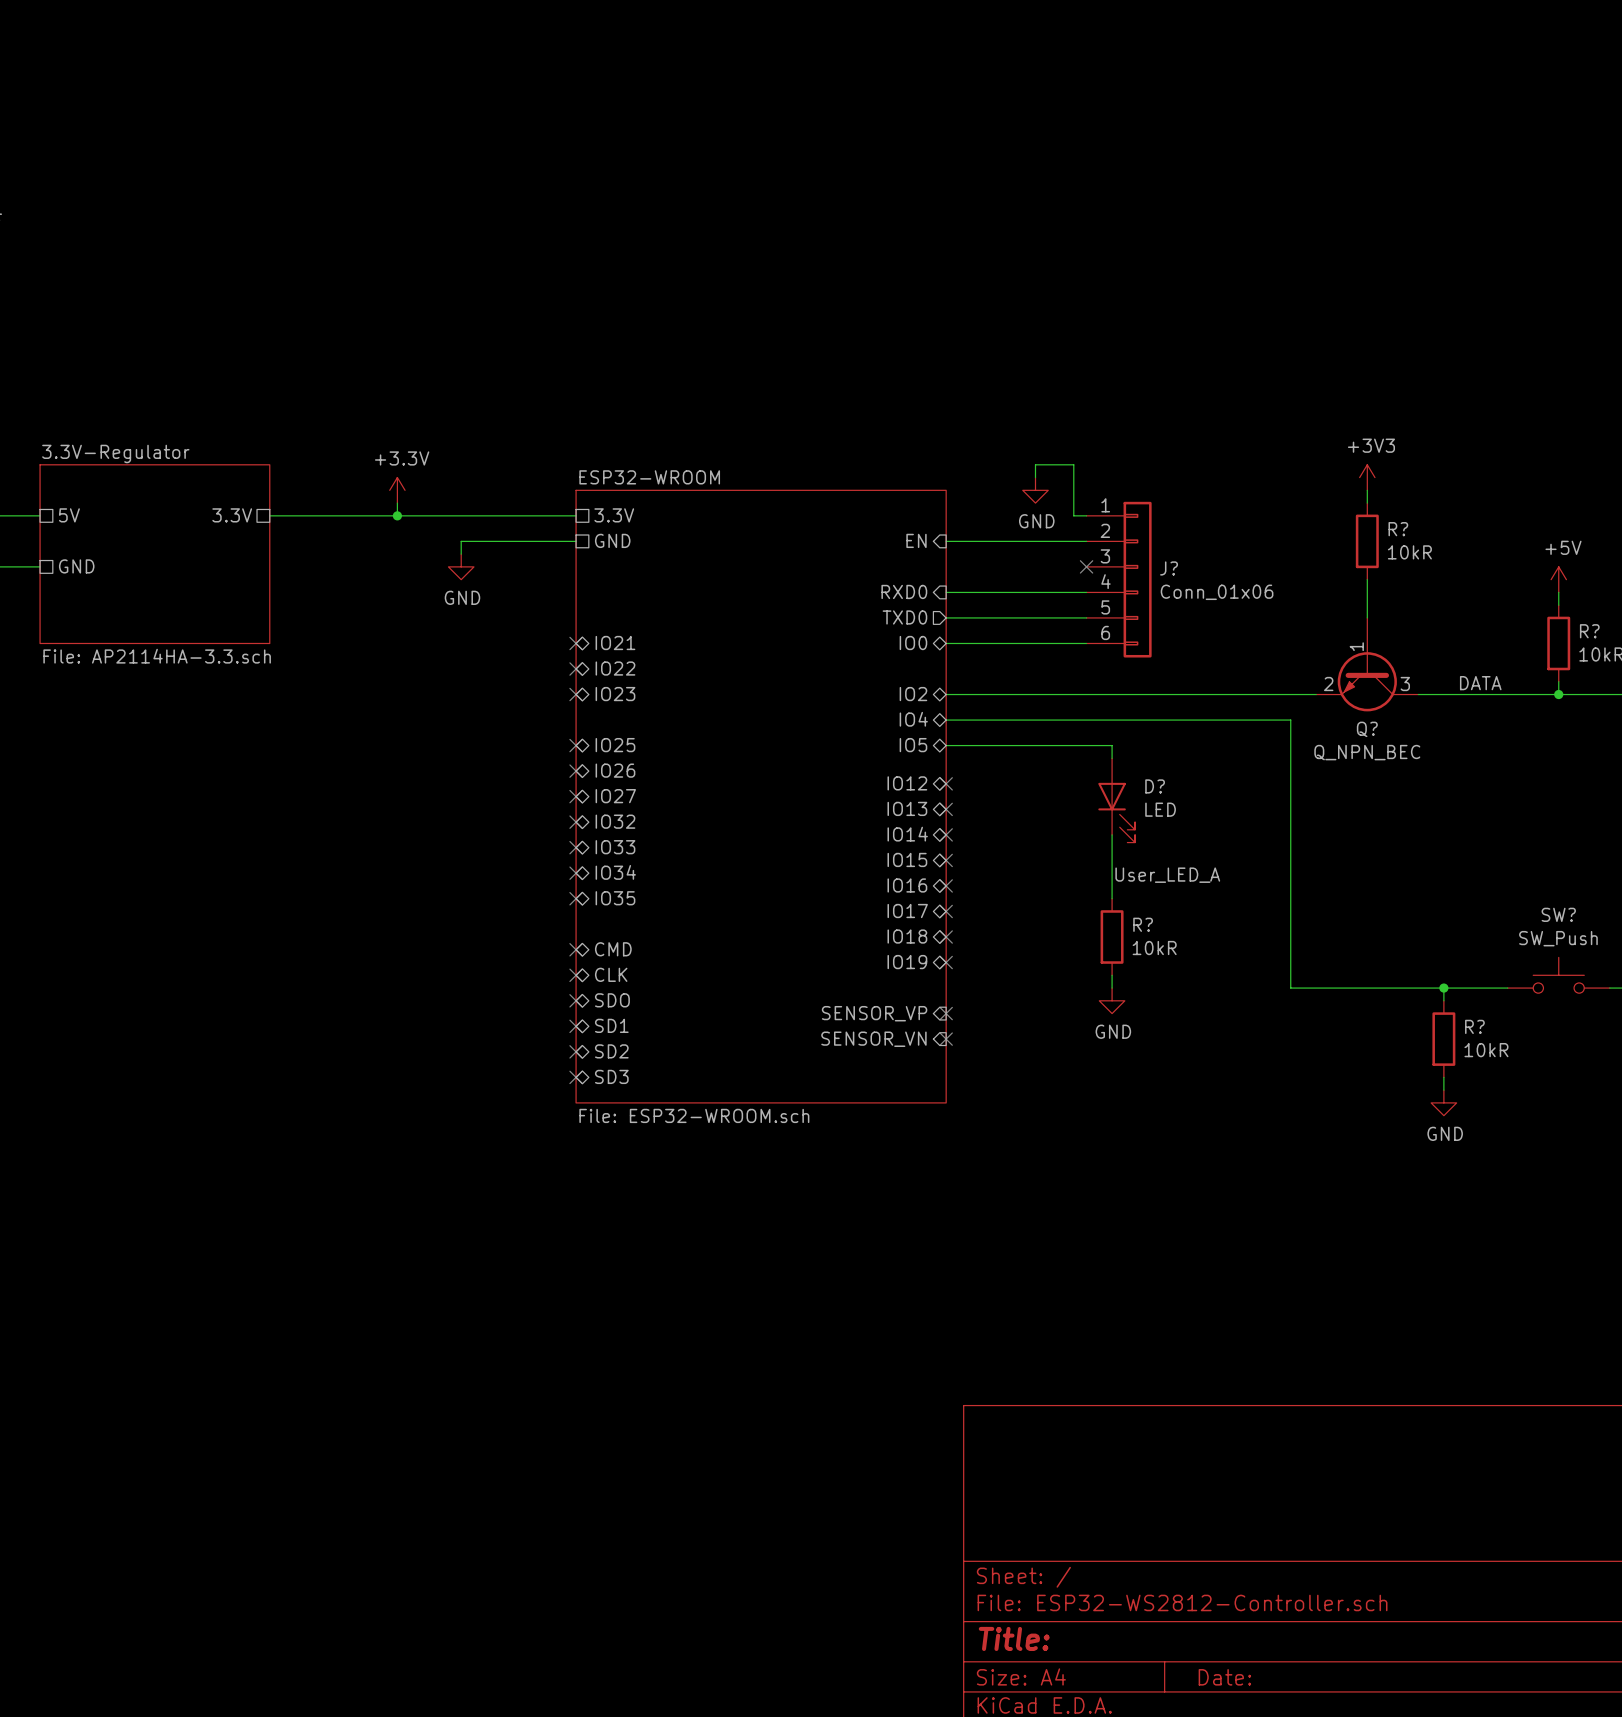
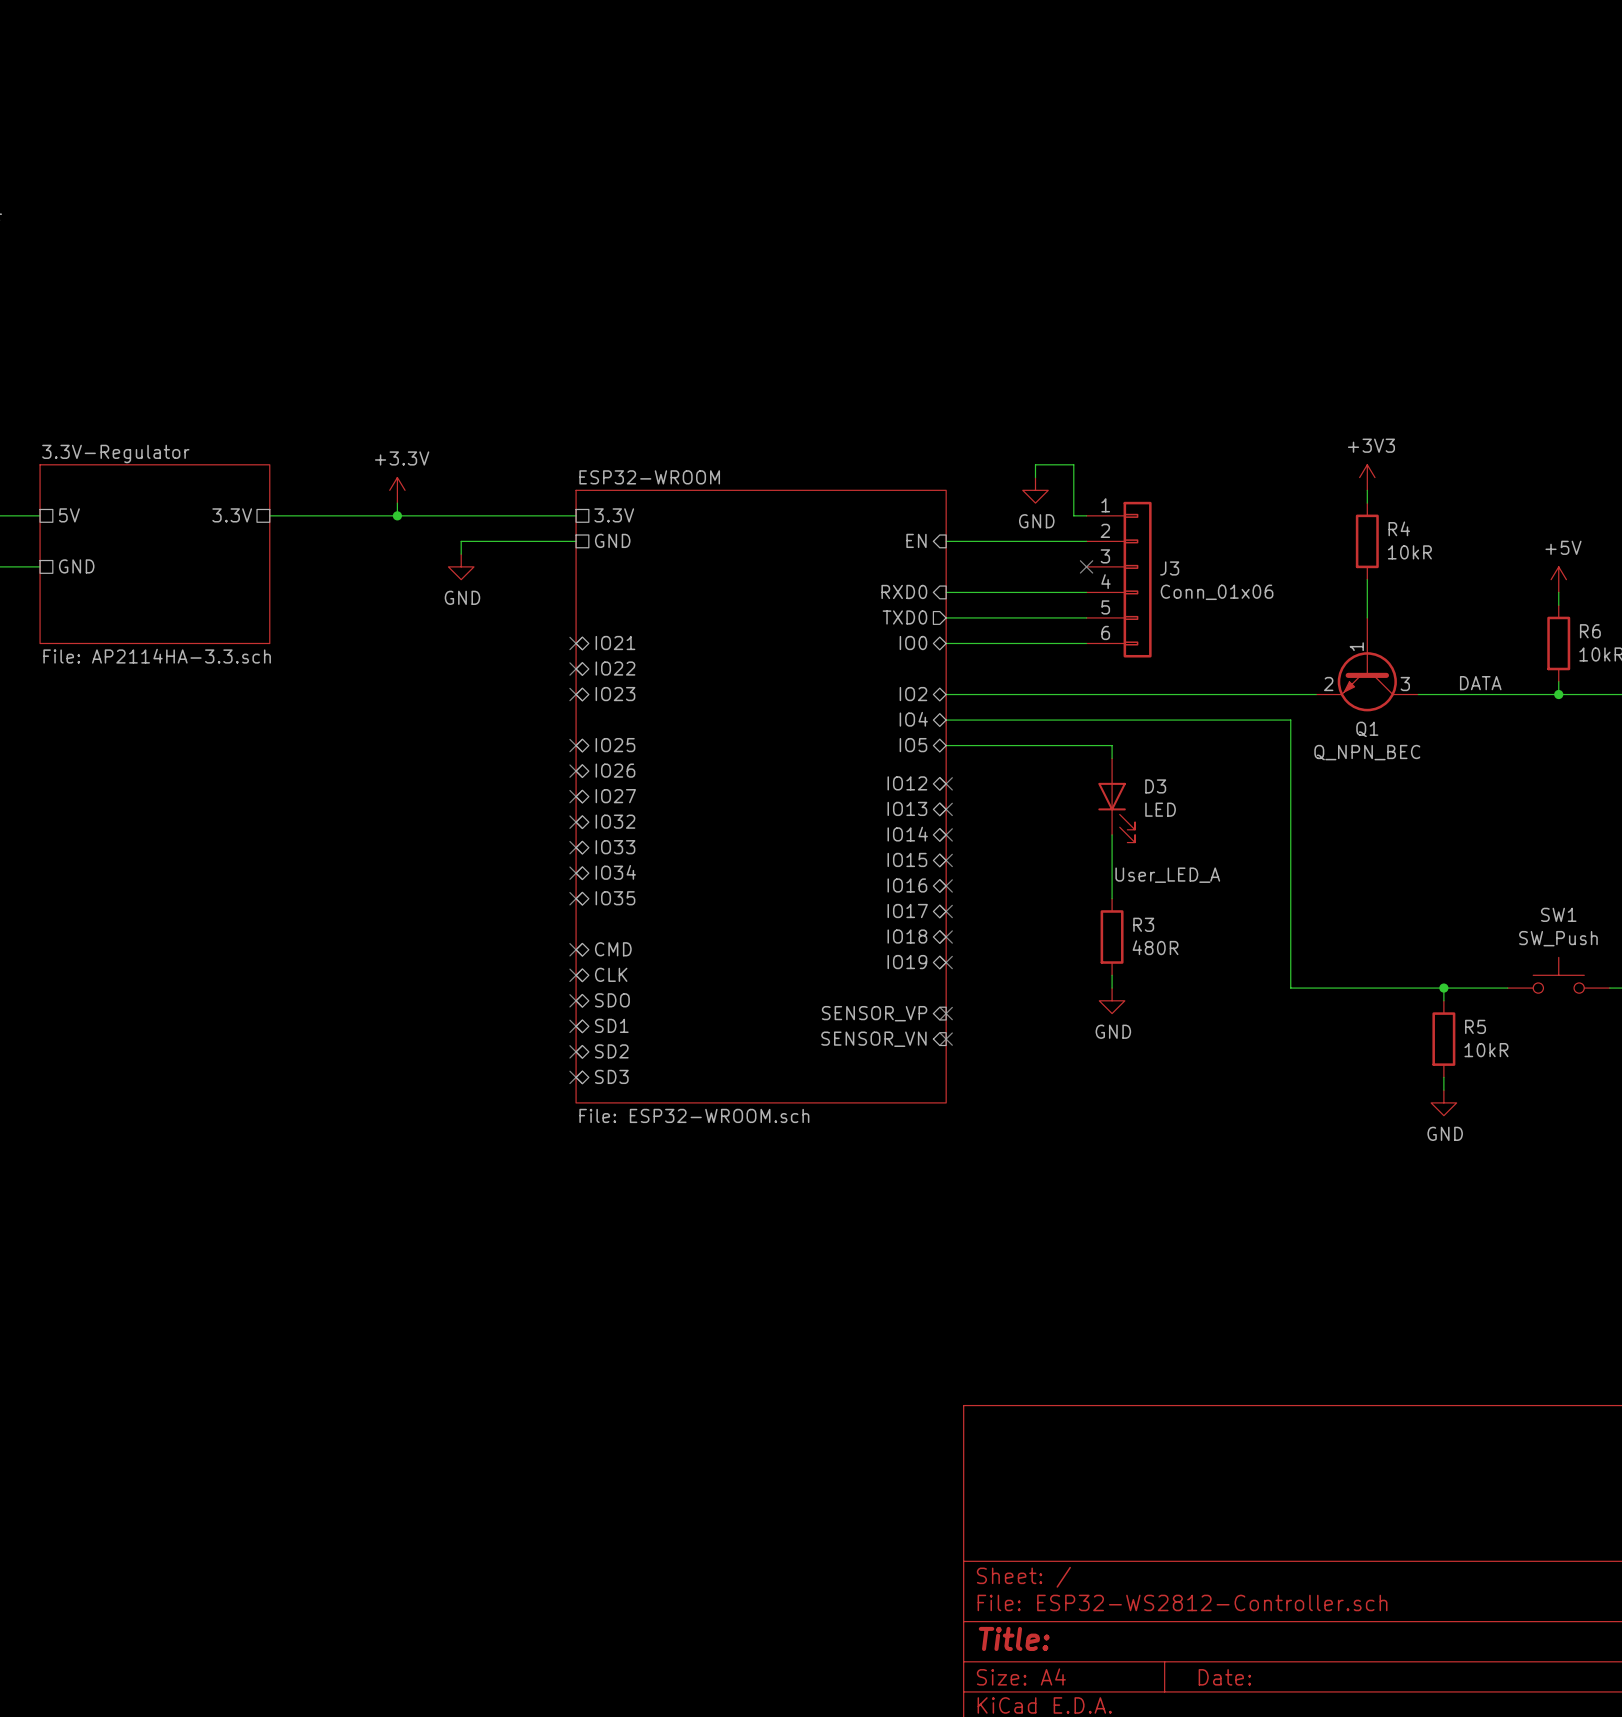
R? name: R? (1398, 529) -> R4 (1399, 528)
J? name: J? (1169, 568) -> J3 (1169, 568)
R? name: R? (1589, 631) -> R6 (1590, 631)
Q? name: Q? (1367, 729) -> Q1 (1367, 729)
D? name: D? (1155, 786) -> D3 (1155, 786)
SW? name: SW? (1558, 914) -> SW1 (1558, 914)
R? name: R? (1143, 924) -> R3 (1143, 924)
R? value: 10kR (1154, 948) -> 480R (1155, 947)
R? name: R? (1474, 1026) -> R5 (1475, 1026)

